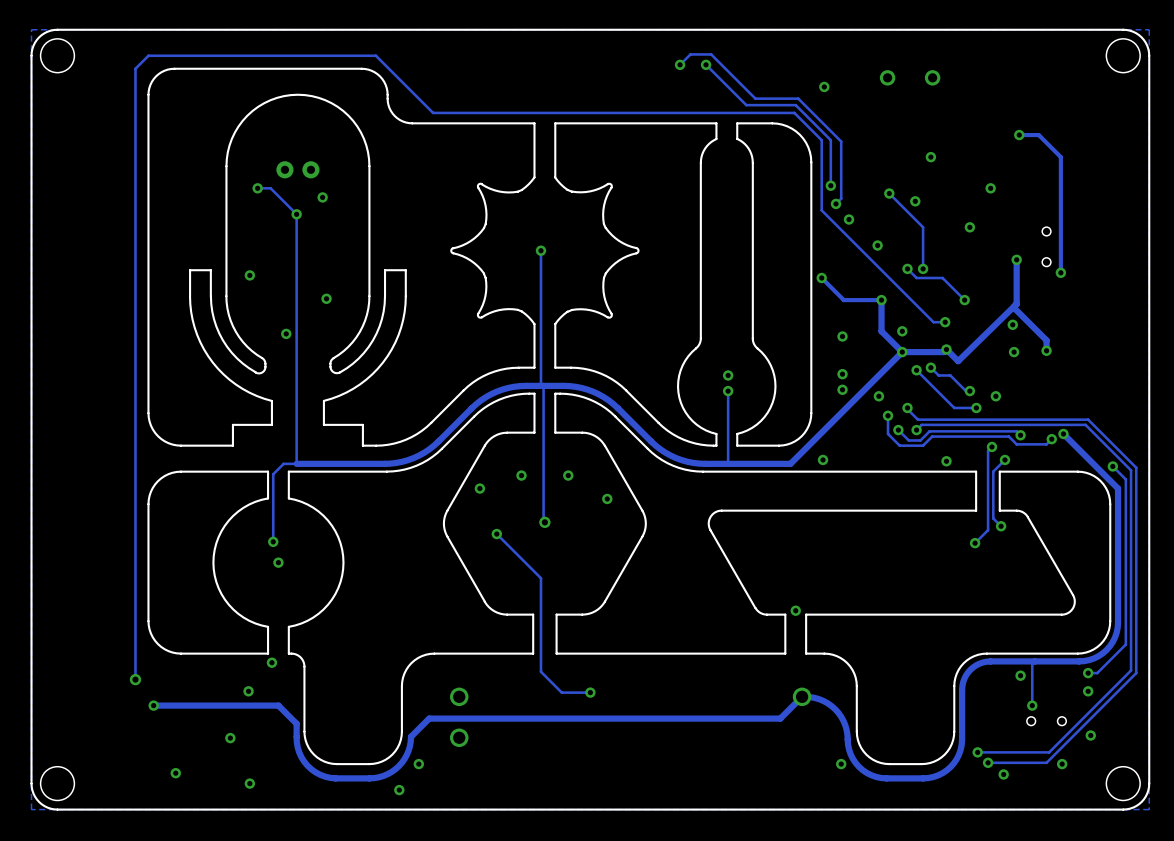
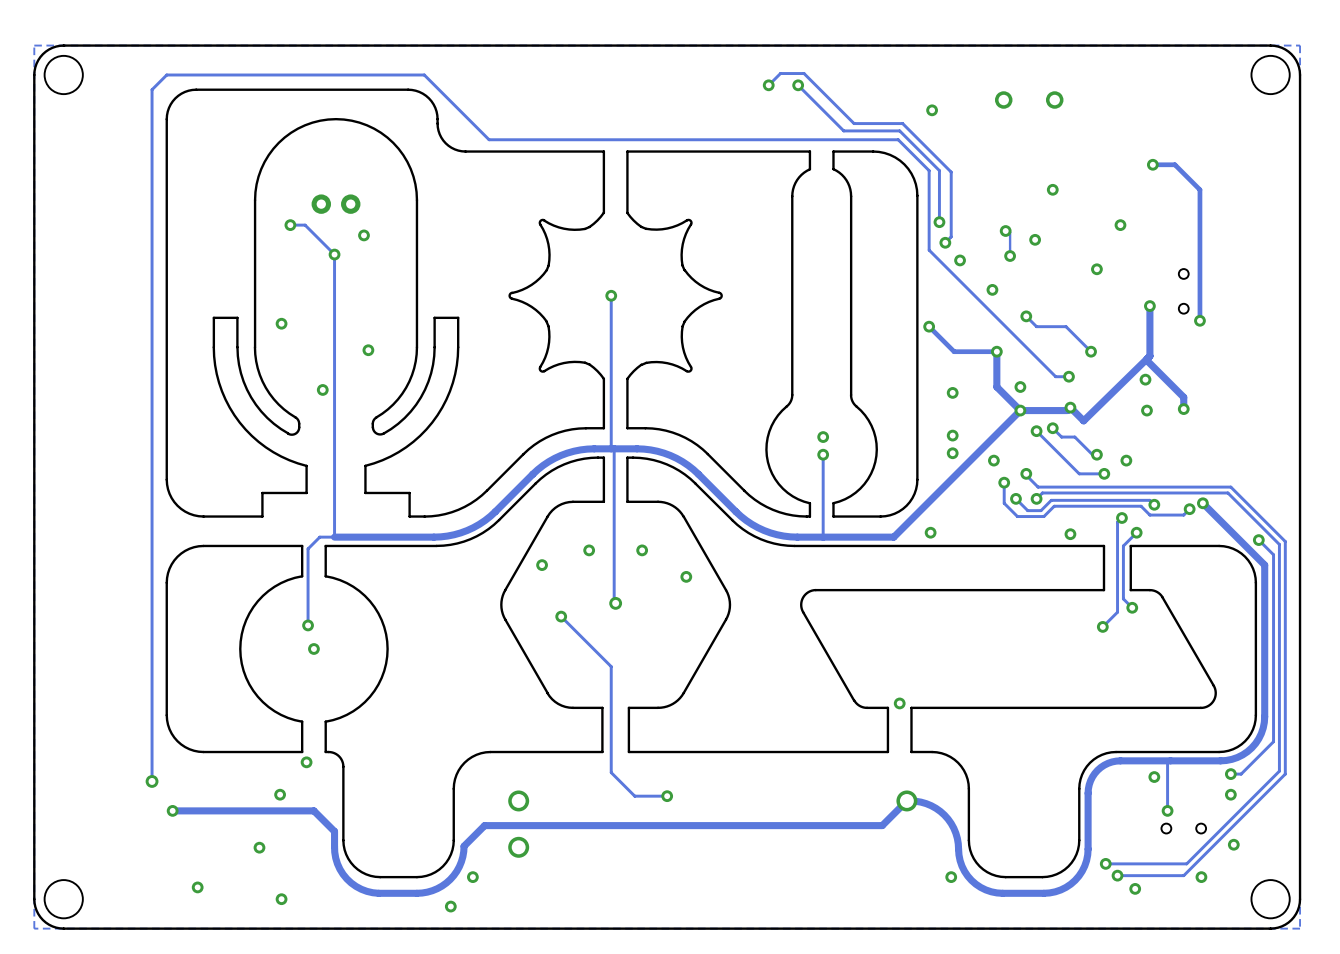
track: none -> (1007, 229) (1010, 232) (1010, 256)
track: (889, 193) (923, 227) (923, 268) -> none
via position: (923, 268) -> (1010, 256)

